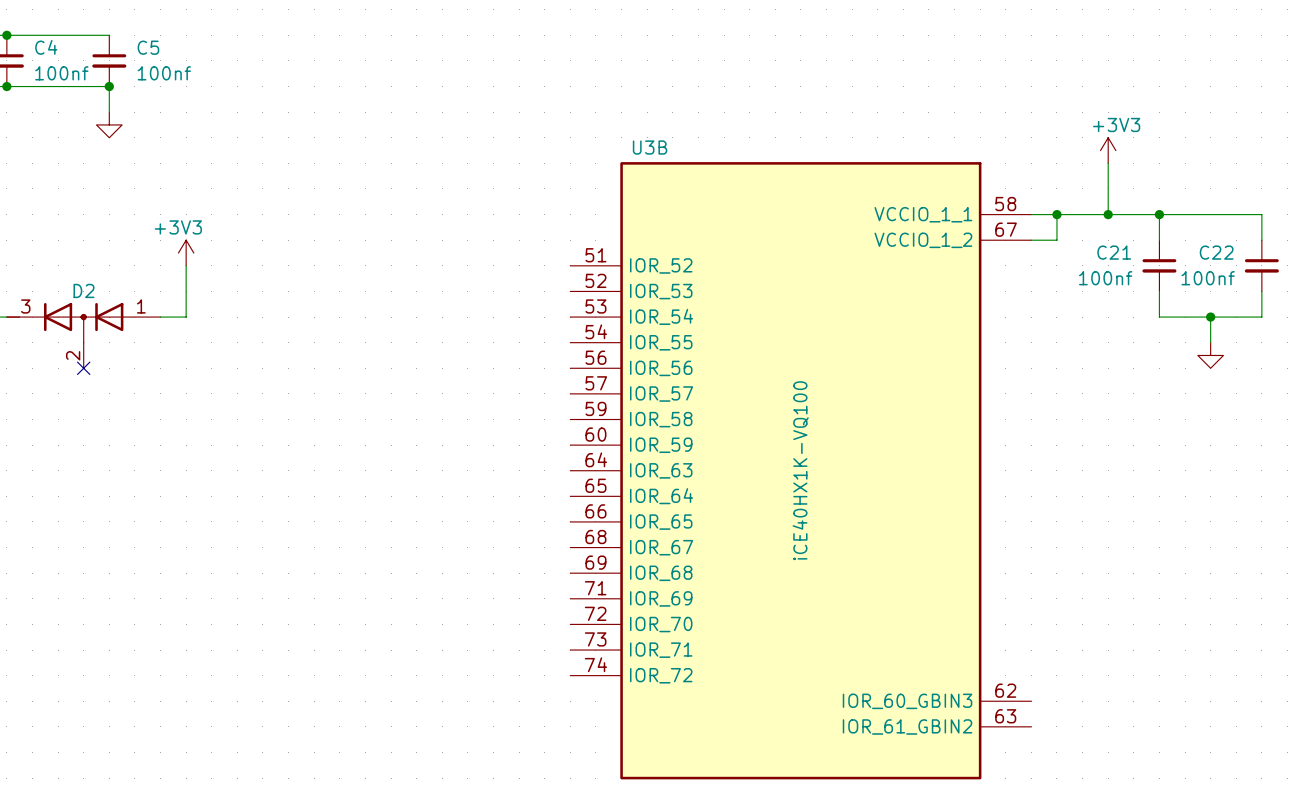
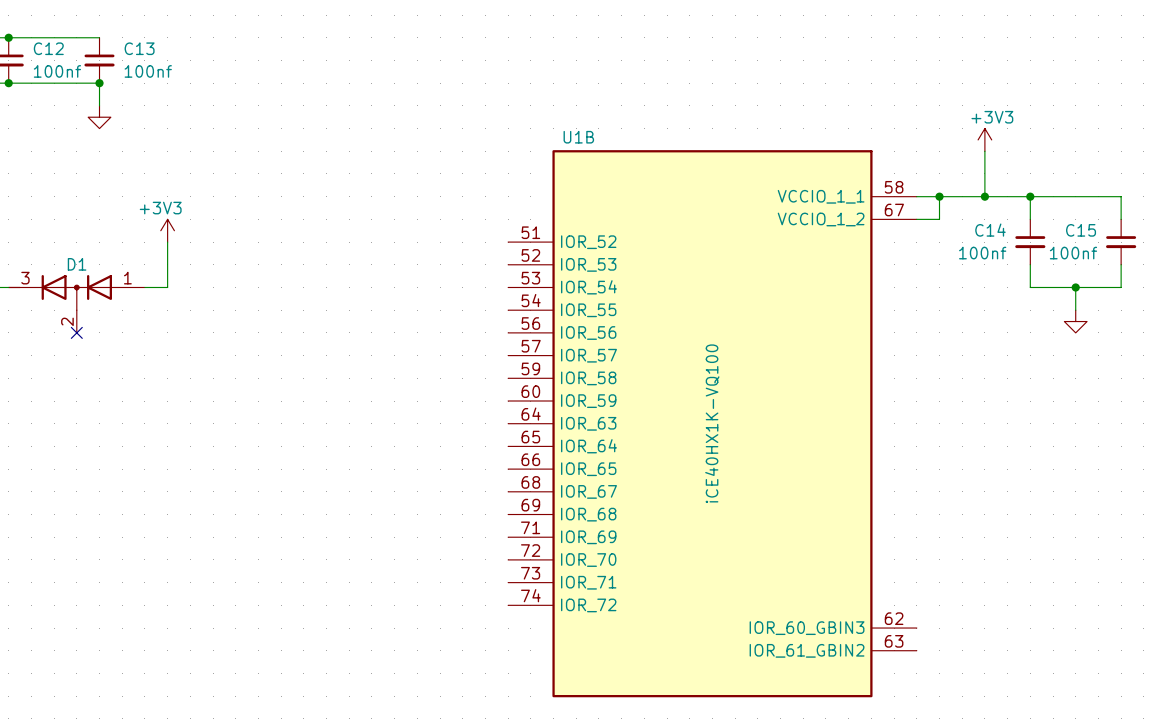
C4 name: C4 (46, 47) -> C12 (48, 48)
C5 name: C5 (148, 47) -> C13 (139, 48)
U3B name: U3B (650, 147) -> U1B (578, 137)
C21 name: C21 (1114, 252) -> C14 (990, 230)
C22 name: C22 (1216, 252) -> C15 (1081, 230)
D2 name: D2 (84, 290) -> D1 (77, 264)

